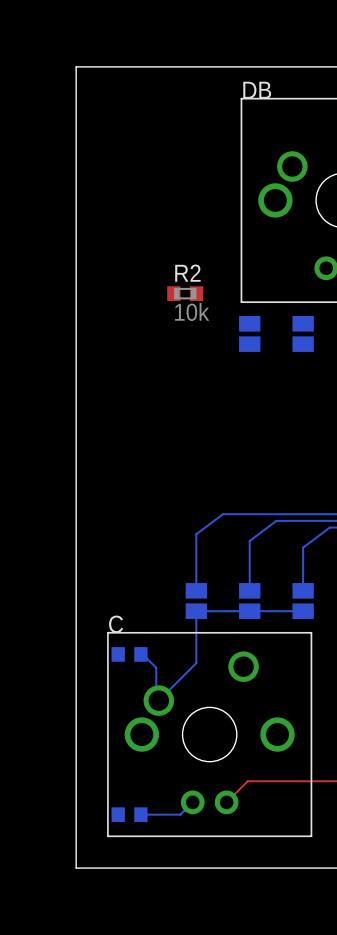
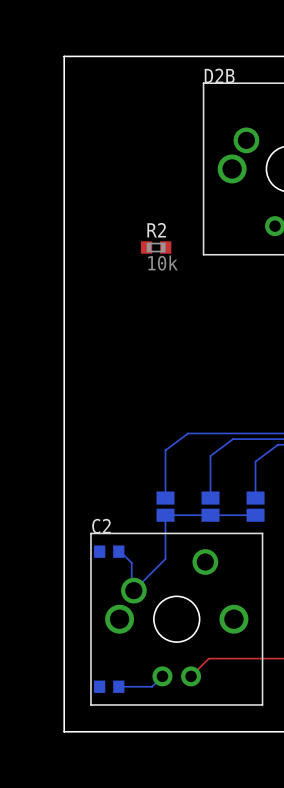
DB name: DB (257, 90) -> D2B (219, 75)
part: (249, 333) -> none
part: (303, 333) -> none
C name: C (116, 624) -> C2 (101, 526)

